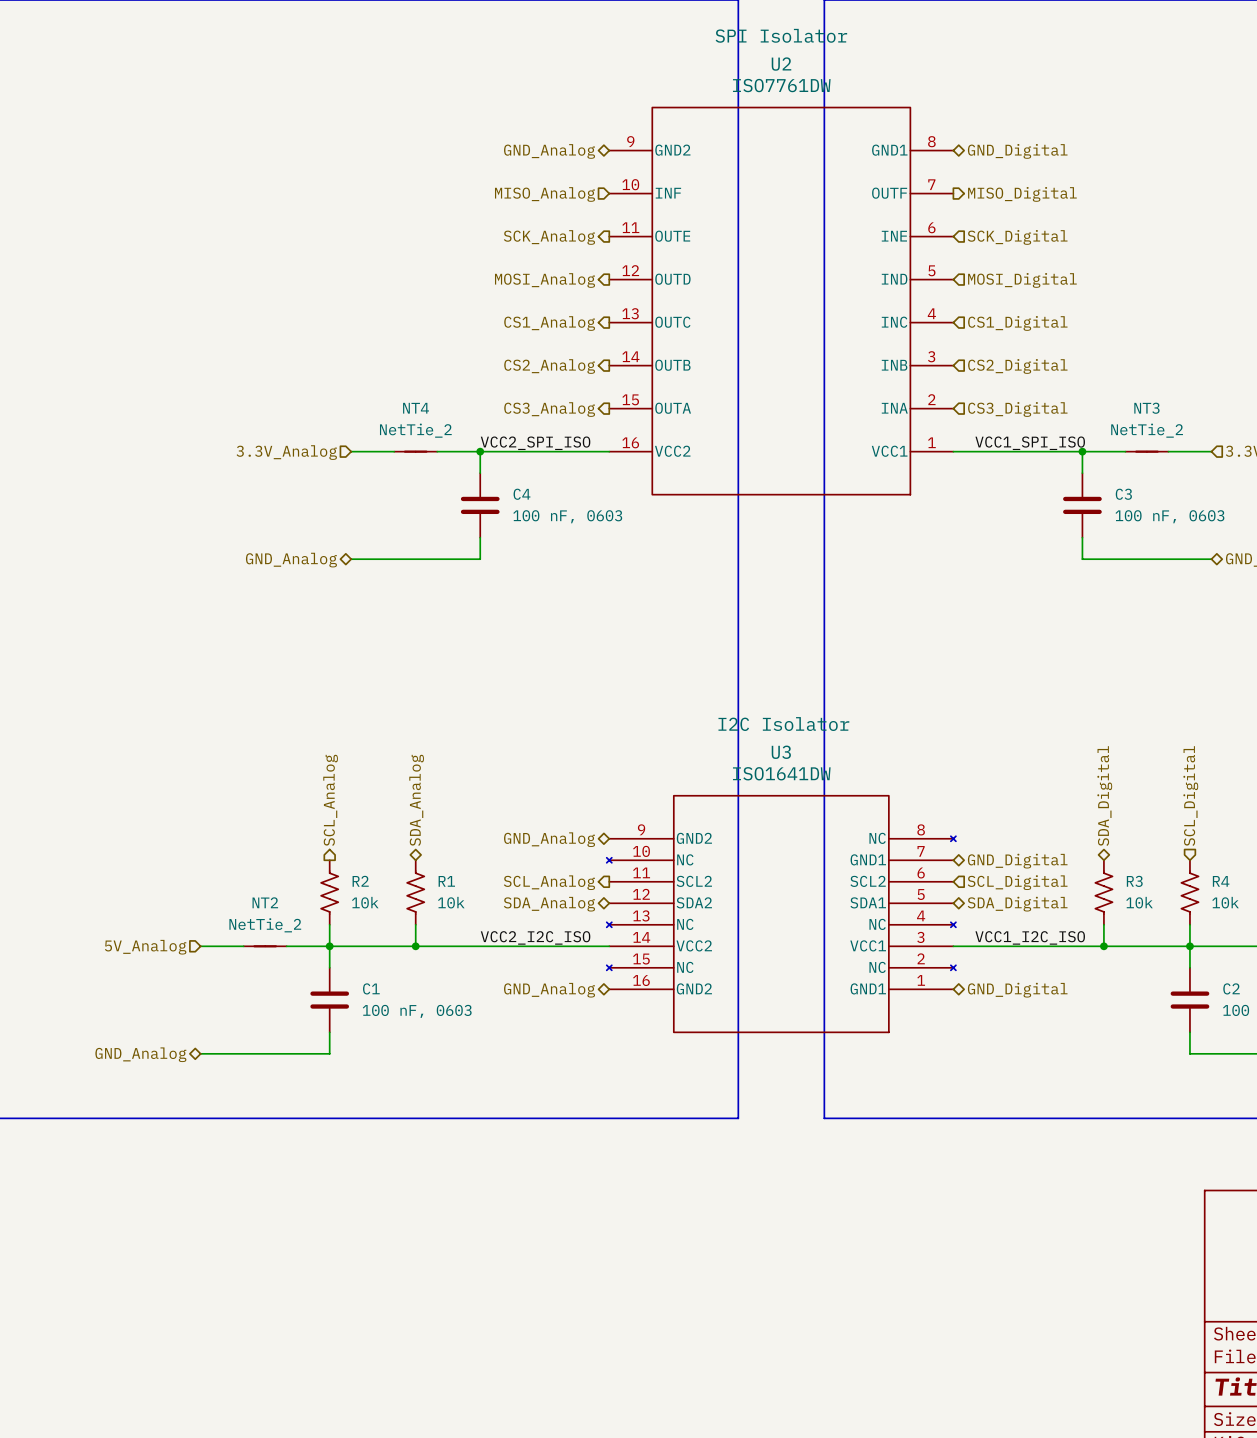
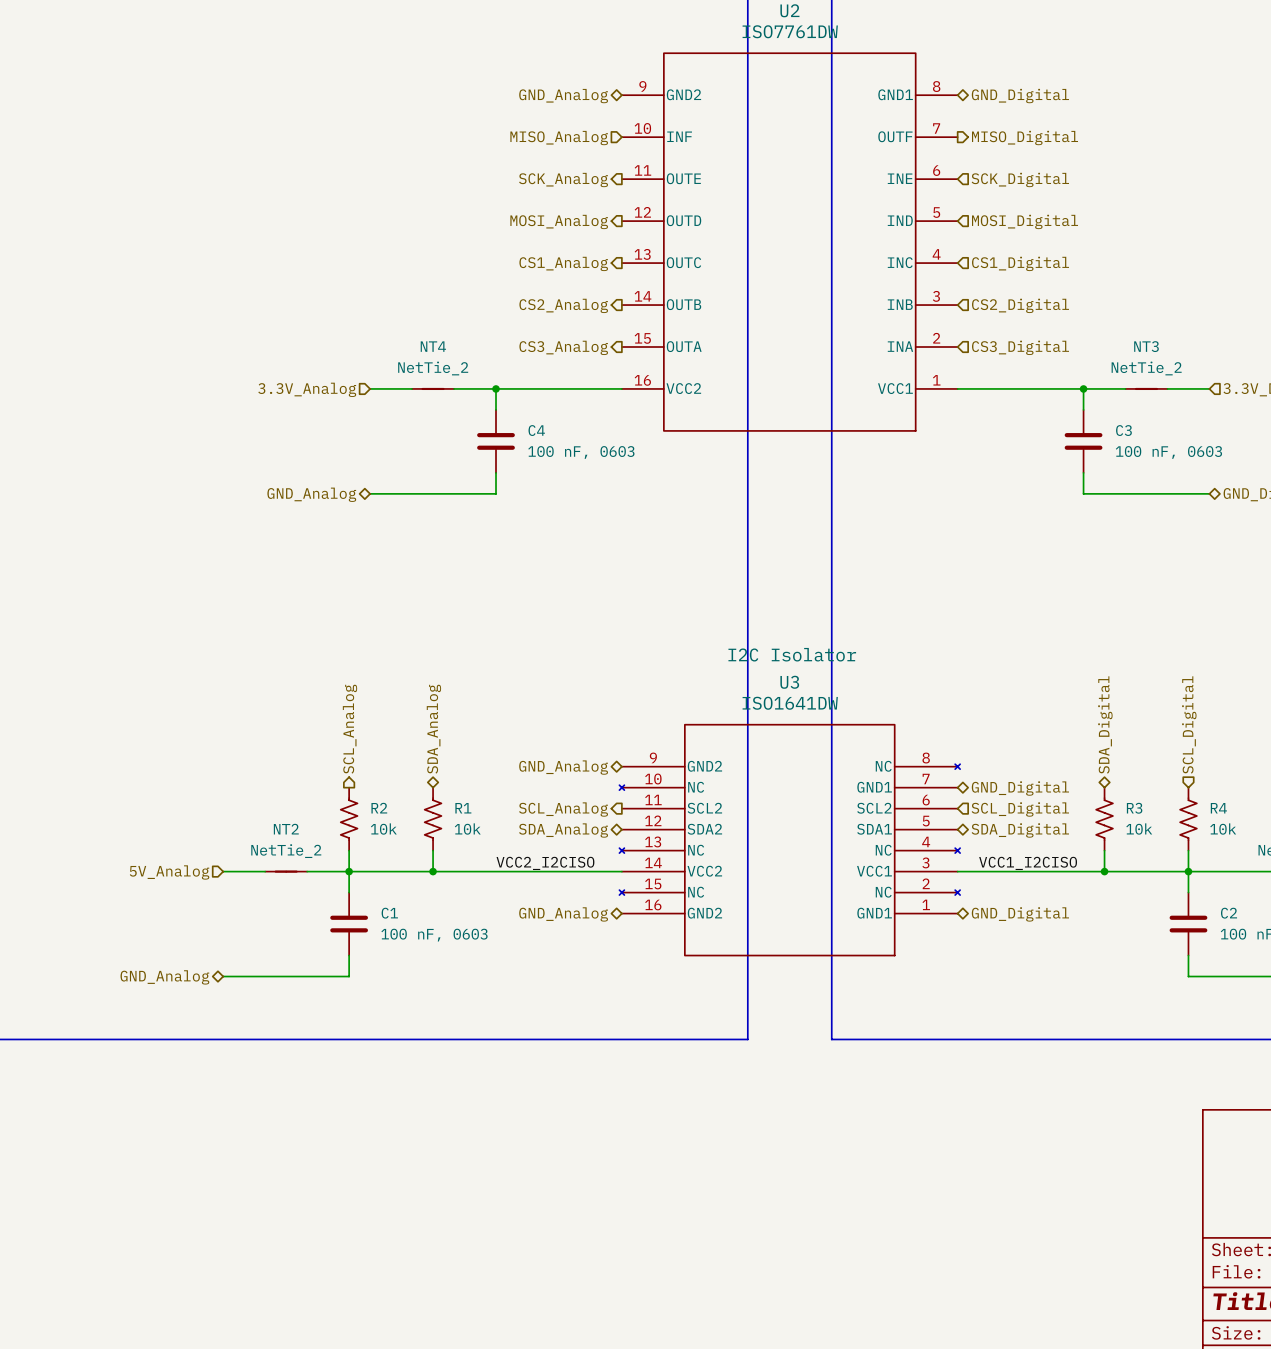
label: VCC2_SPI_ISO (535, 443) -> none
label: VCC1_SPI_ISO (1030, 443) -> none
label: VCC2_I2C_ISO (535, 937) -> VCC2_I2CISO (545, 863)
label: VCC1_I2C_ISO (1030, 937) -> VCC1_I2CISO (1028, 863)

